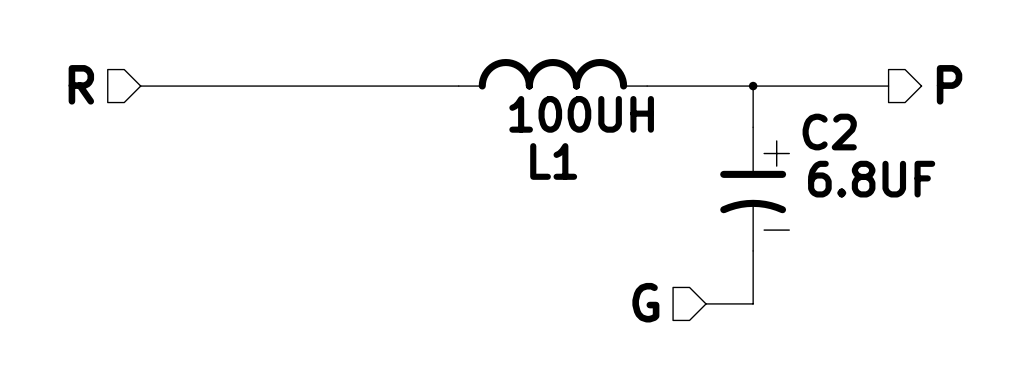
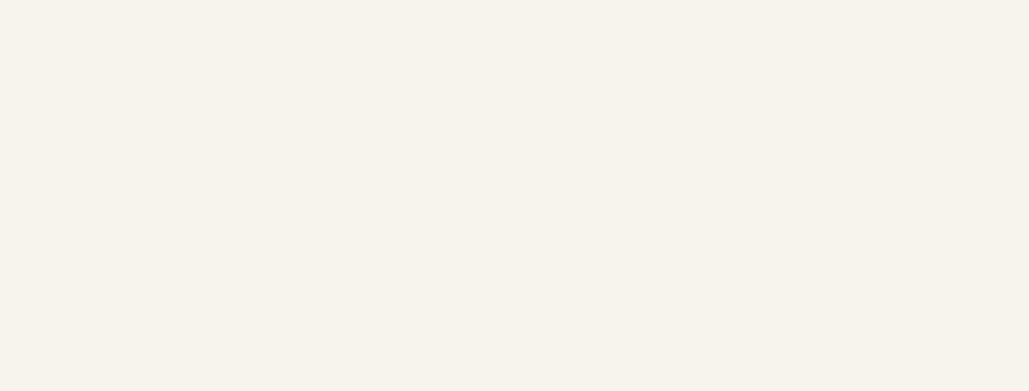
part: 100UH (552, 74) -> none
hierarchical label: R (81, 84) -> none
hierarchical label: P (949, 84) -> none
wire: (140, 86) (458, 86) -> none
wire: (647, 86) (888, 86) -> none
wire: (753, 86) (753, 127) -> none
junction: (753, 86) -> none
part: 6.8UF (753, 189) -> none
wire: (753, 250) (753, 303) (706, 303) -> none
hierarchical label: G (645, 302) -> none

